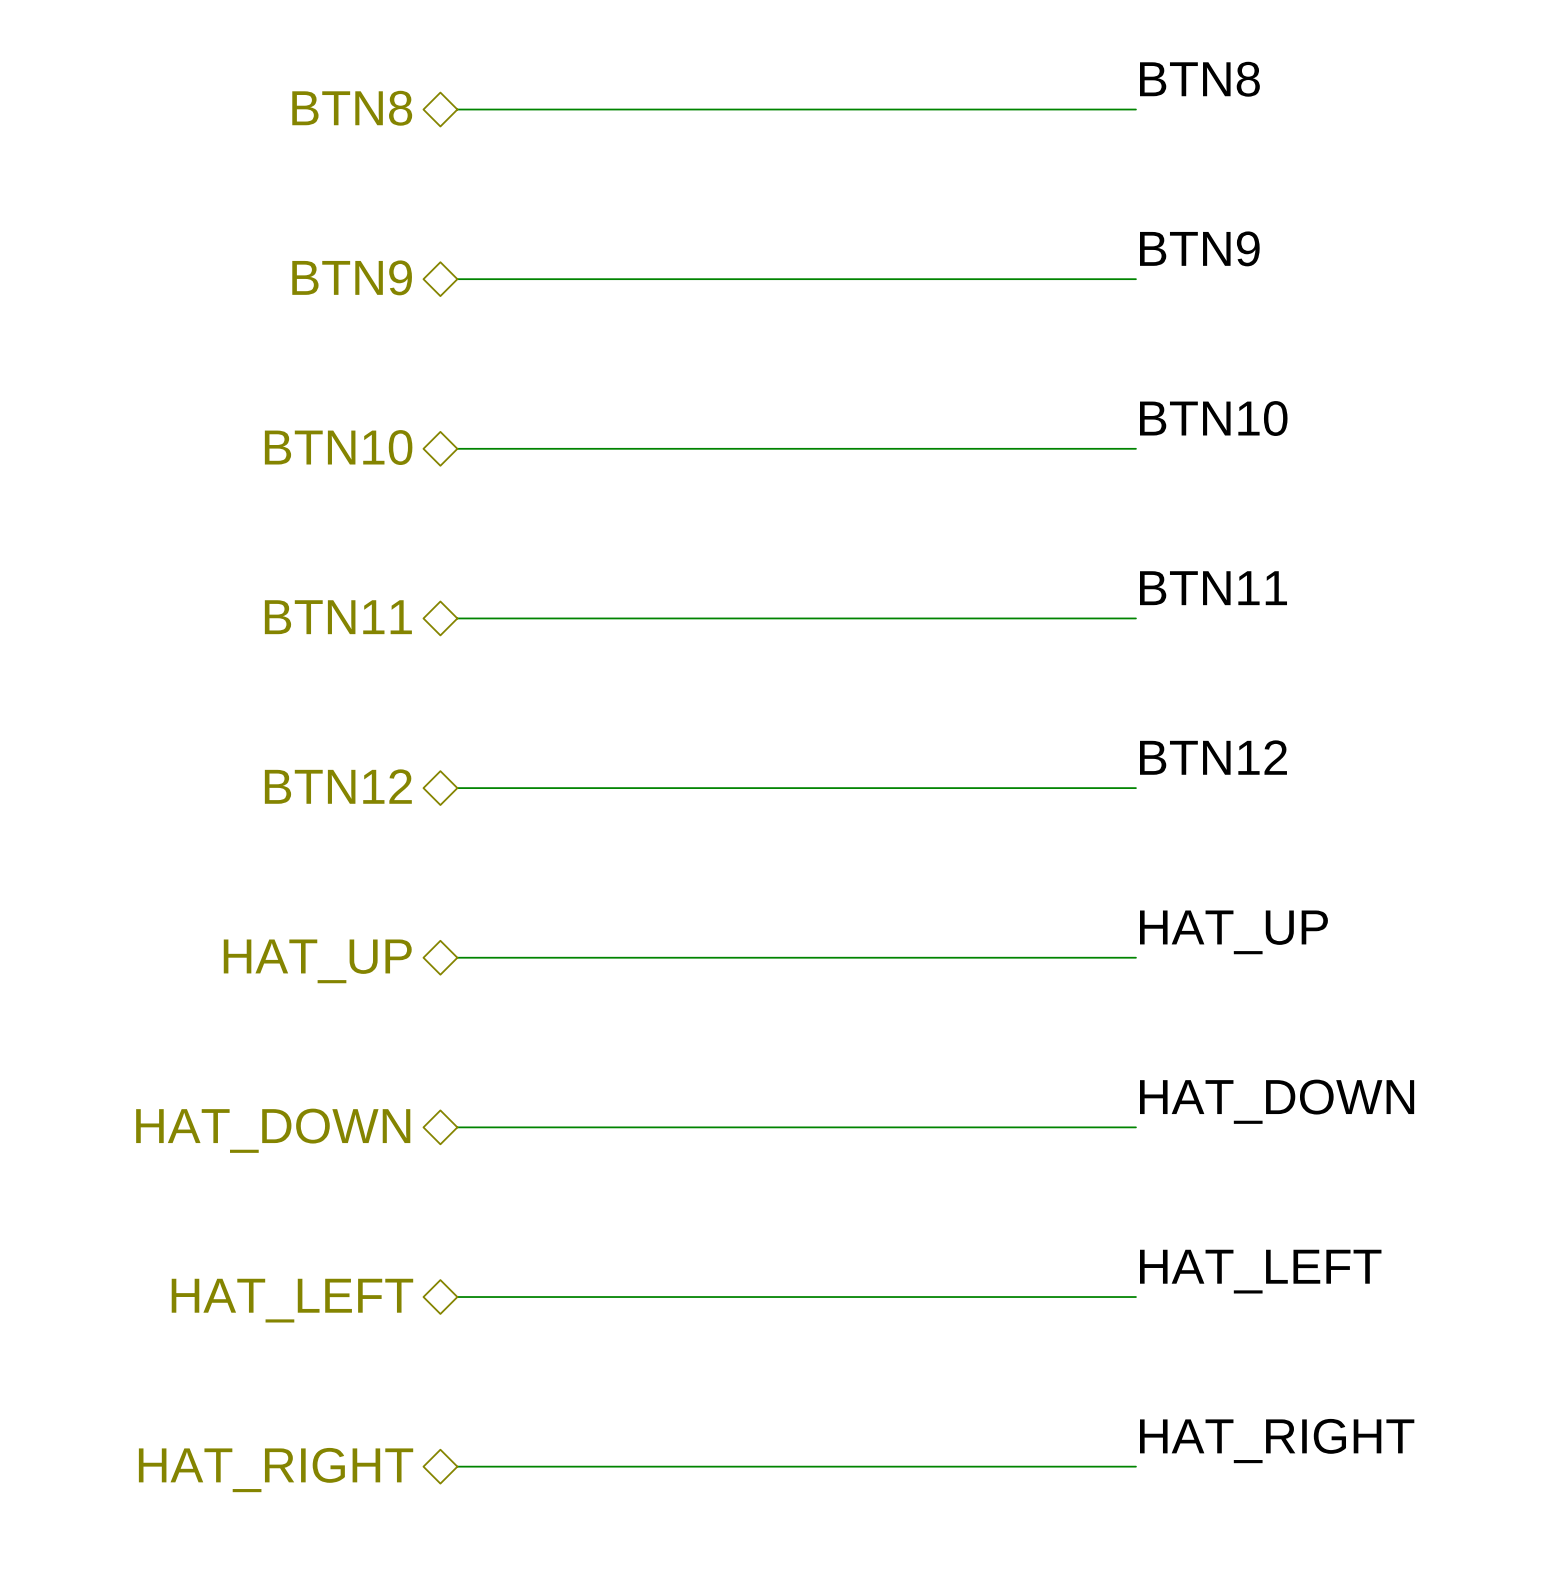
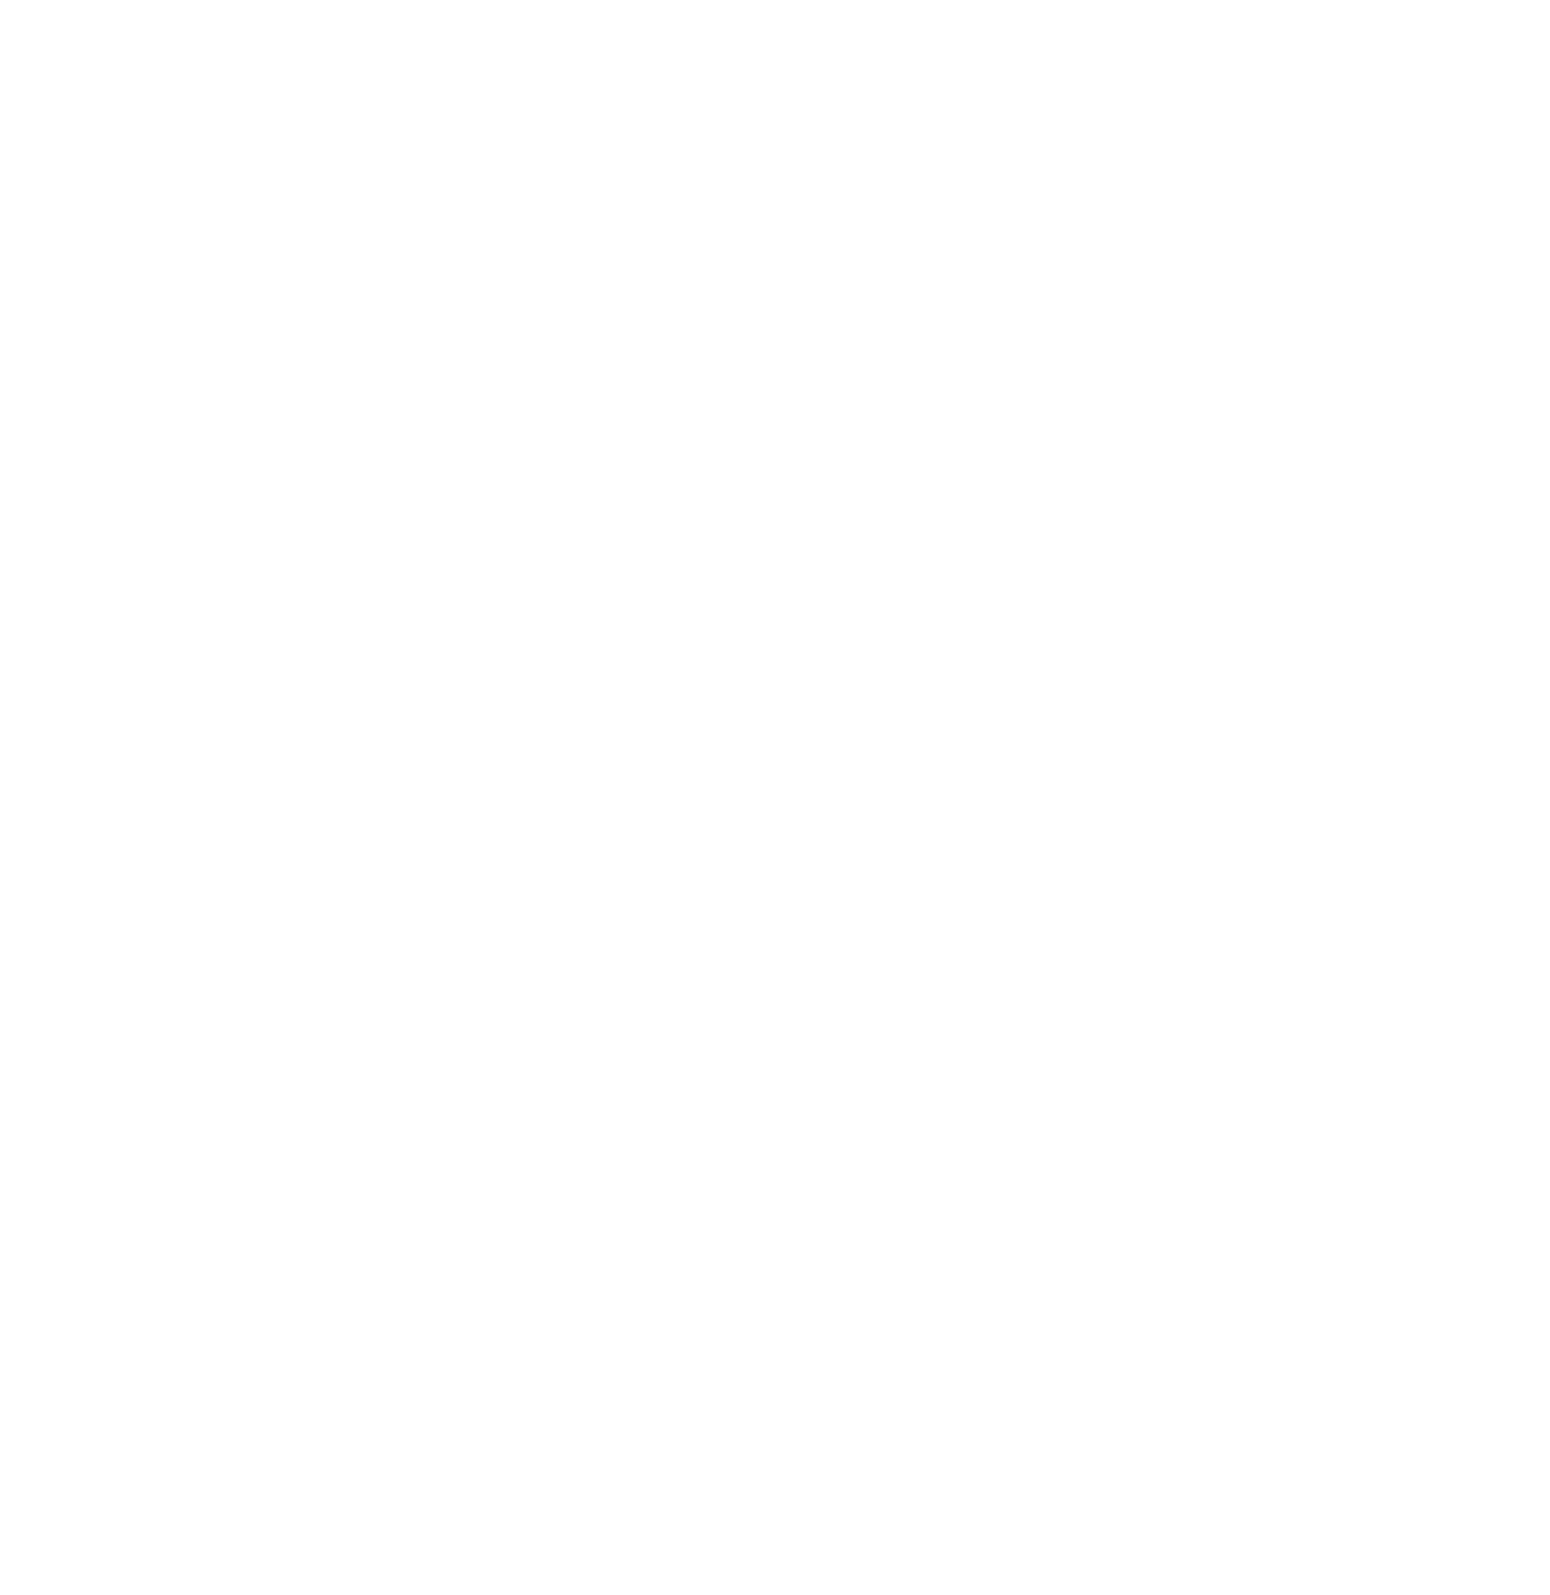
label: BTN8 (1199, 79) -> none
hierarchical label: BTN8 (352, 108) -> none
wire: (457, 109) (1135, 109) -> none
label: BTN9 (1199, 248) -> none
hierarchical label: BTN9 (352, 277) -> none
wire: (457, 279) (1135, 279) -> none
label: BTN10 (1213, 418) -> none
hierarchical label: BTN10 (338, 447) -> none
wire: (457, 448) (1135, 448) -> none
label: BTN11 (1213, 588) -> none
hierarchical label: BTN11 (338, 617) -> none
wire: (457, 618) (1135, 618) -> none
label: BTN12 (1213, 757) -> none
hierarchical label: BTN12 (338, 786) -> none
wire: (457, 788) (1135, 788) -> none
label: HAT_UP (1233, 932) -> none
wire: (457, 957) (1135, 957) -> none
hierarchical label: HAT_UP (317, 961) -> none
label: HAT_DOWN (1277, 1101) -> none
wire: (457, 1127) (1135, 1127) -> none
hierarchical label: HAT_DOWN (273, 1130) -> none
label: HAT_LEFT (1260, 1271) -> none
wire: (457, 1297) (1135, 1297) -> none
hierarchical label: HAT_LEFT (292, 1300) -> none
label: HAT_RIGHT (1277, 1441) -> none
wire: (457, 1466) (1135, 1466) -> none
hierarchical label: HAT_RIGHT (276, 1470) -> none

